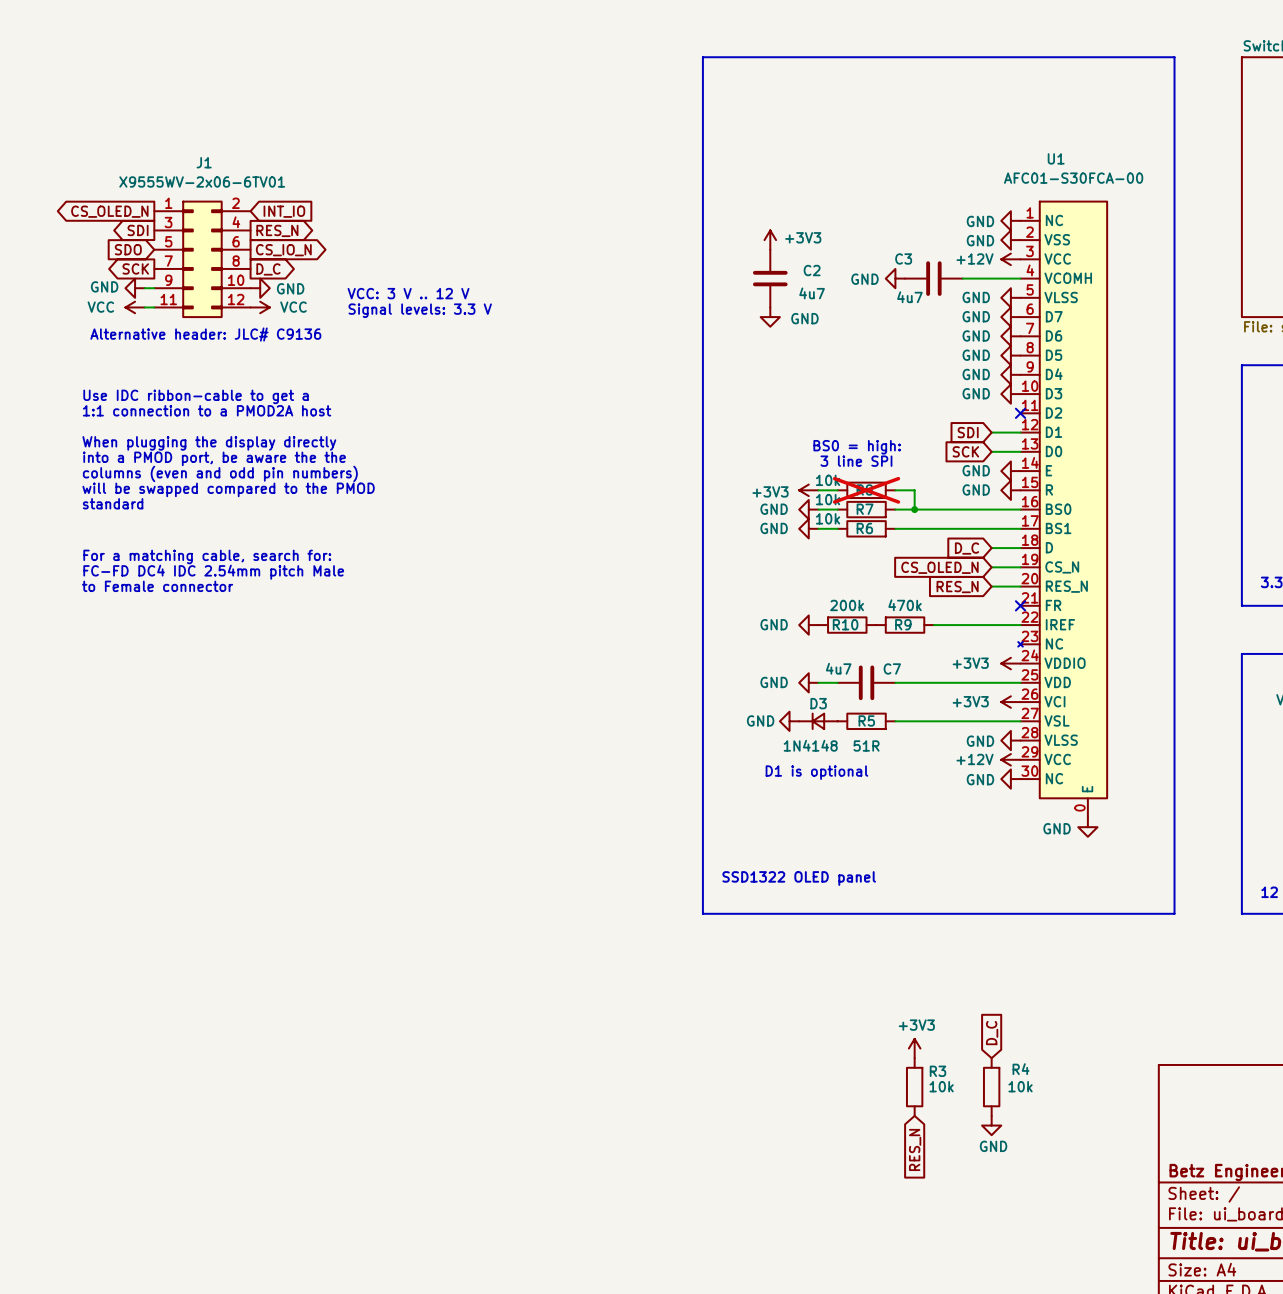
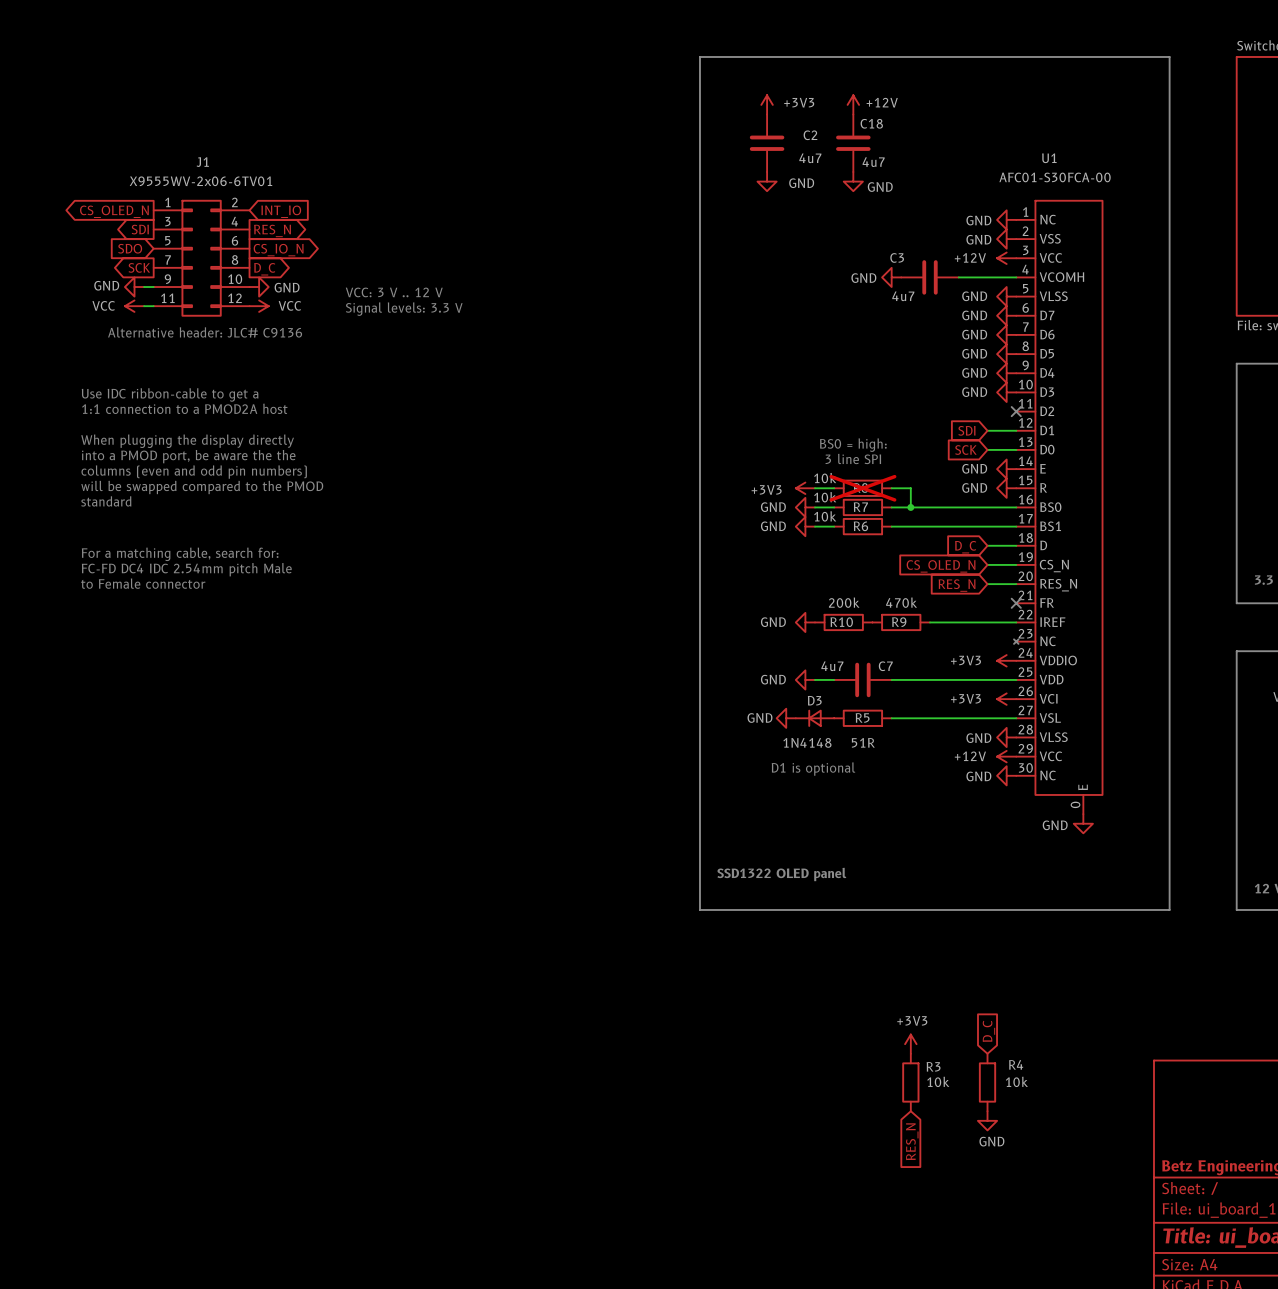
power symbol: none -> +12V (853, 104)
C18: none -> 4u7 (853, 143)
power symbol: none -> GND (767, 181)
power symbol: none -> GND (853, 181)
power symbol position: +3V3 (770, 240) -> +3V3 (767, 104)
C2 position: (770, 278) -> (767, 143)
power symbol: GND (770, 317) -> none

